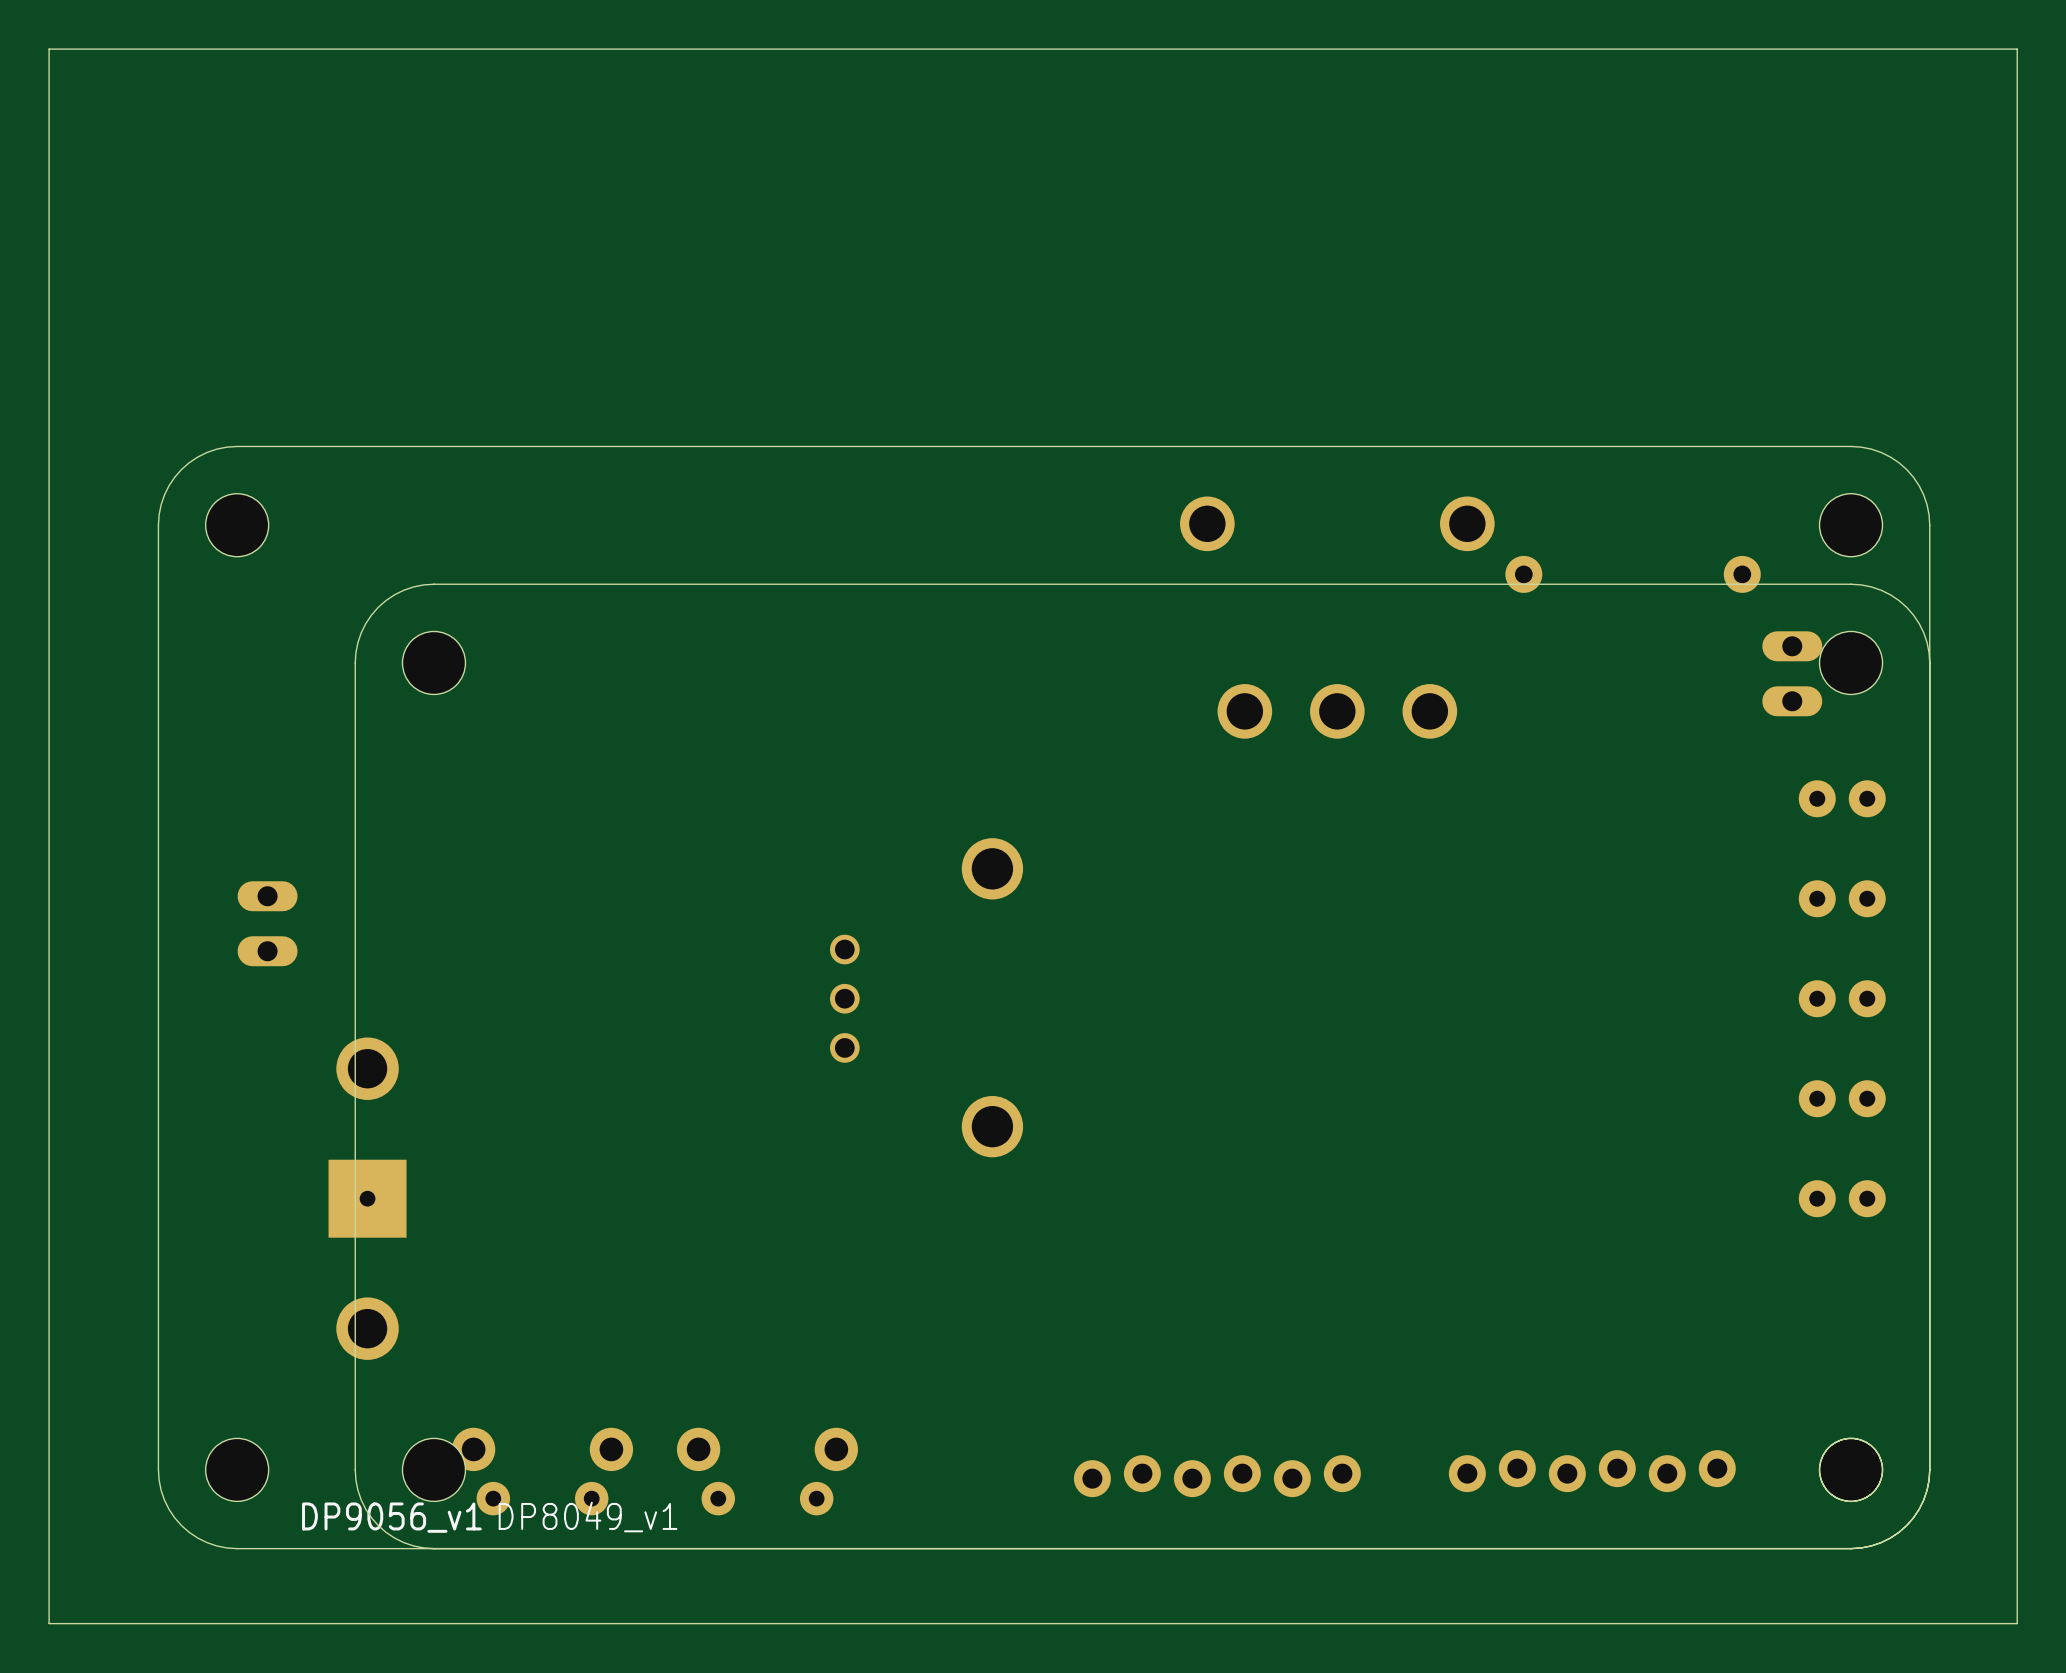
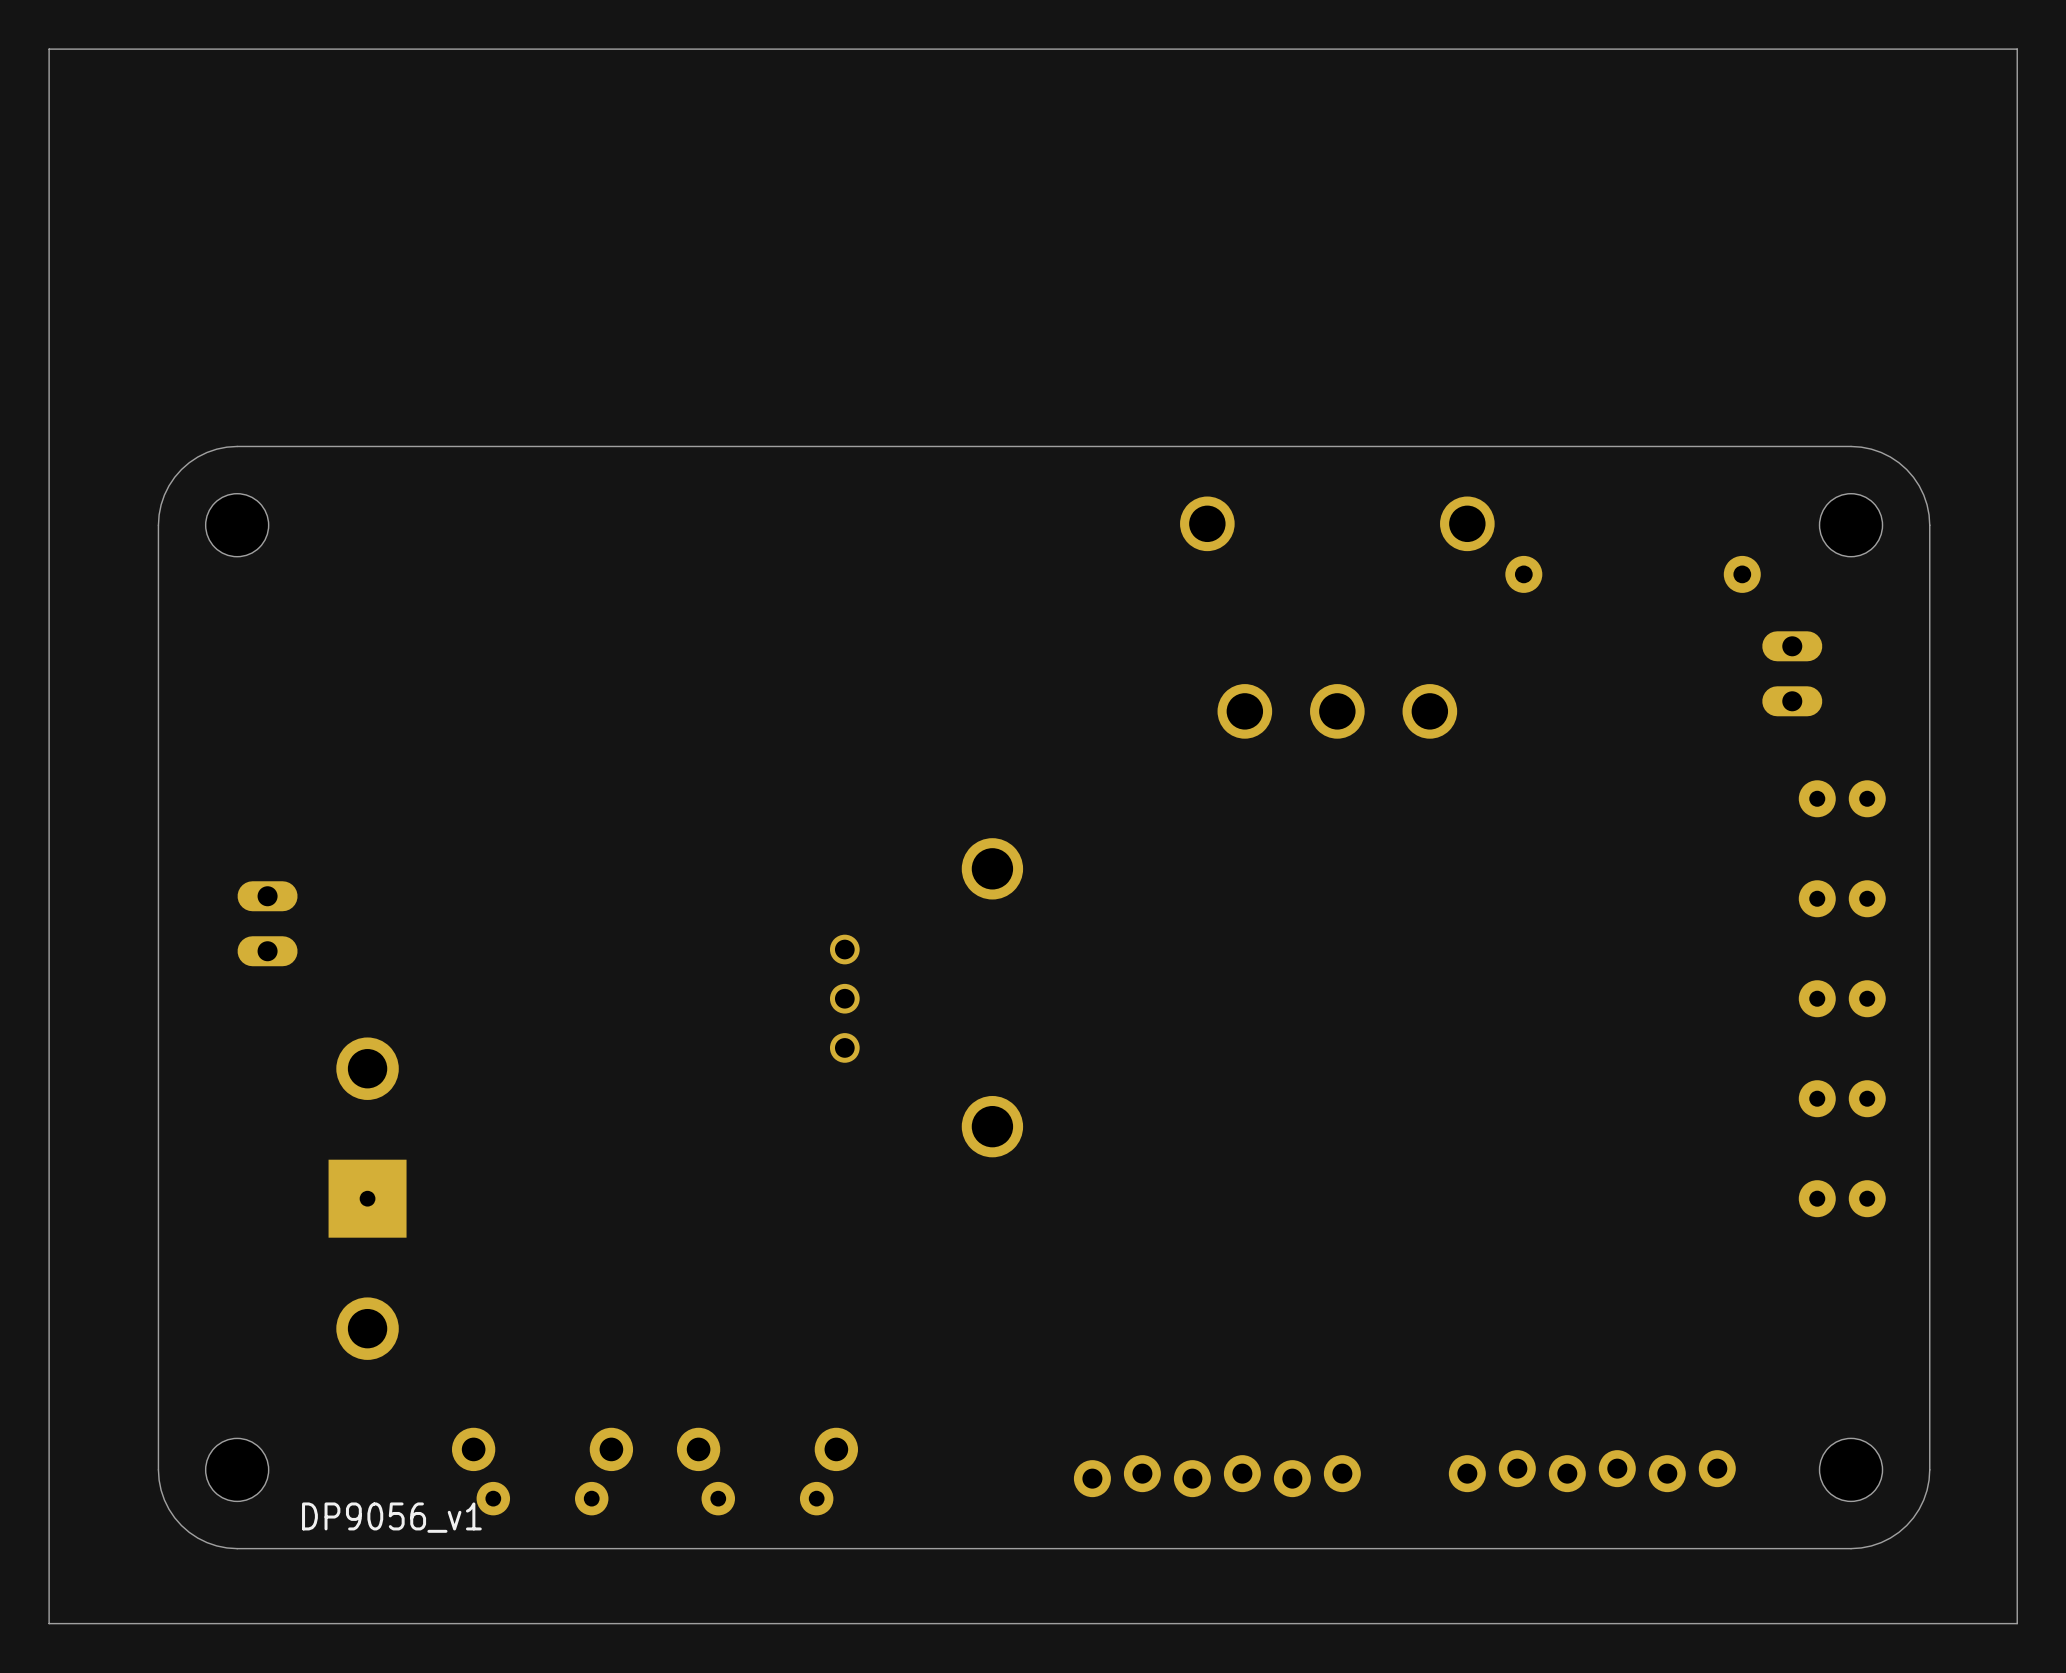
part: (1142, 1066) -> none

